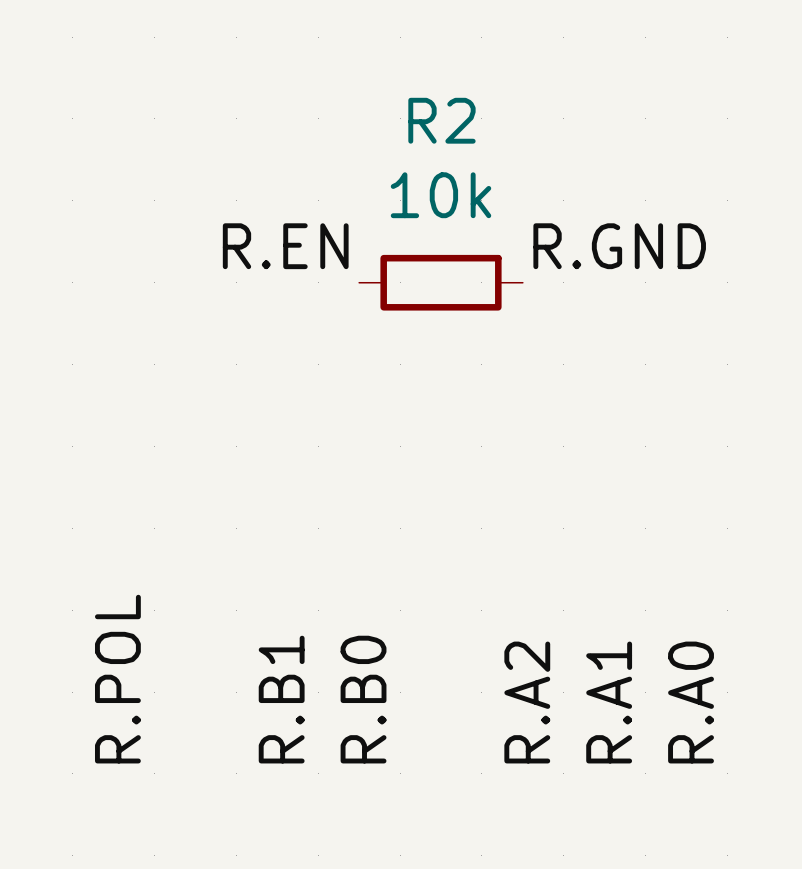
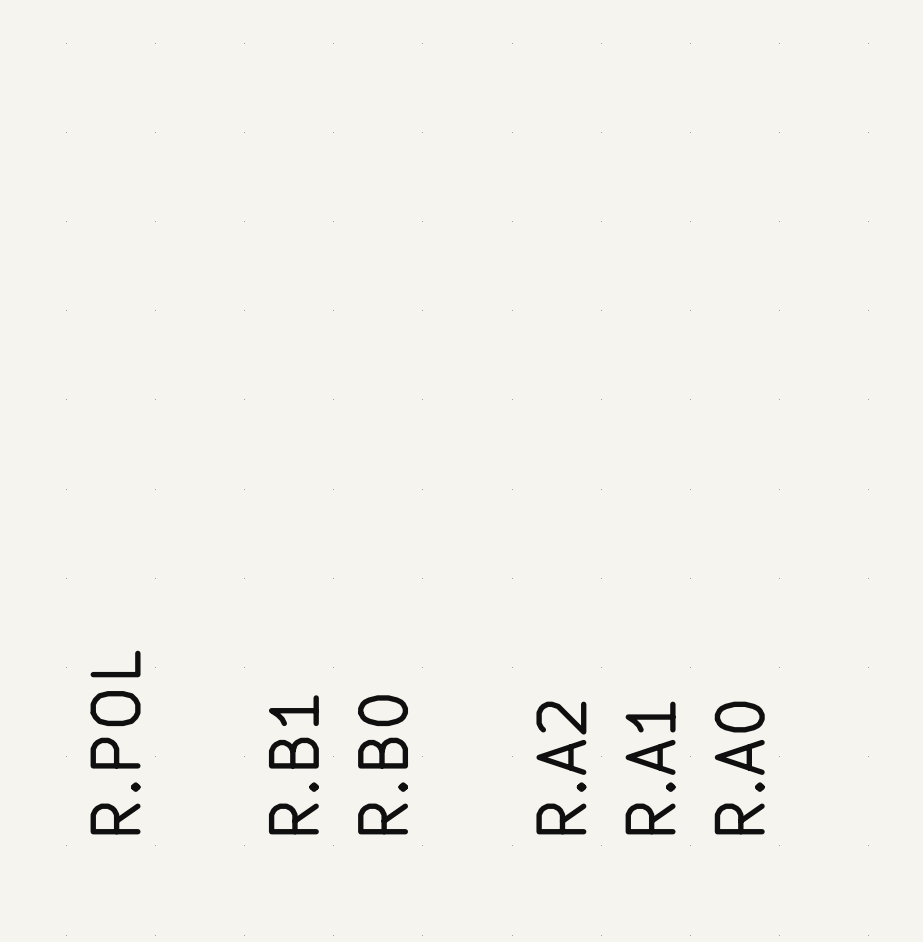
label: R.EN (285, 246) -> none
label: R.GND (619, 246) -> none
R2: 10k (441, 282) -> none

